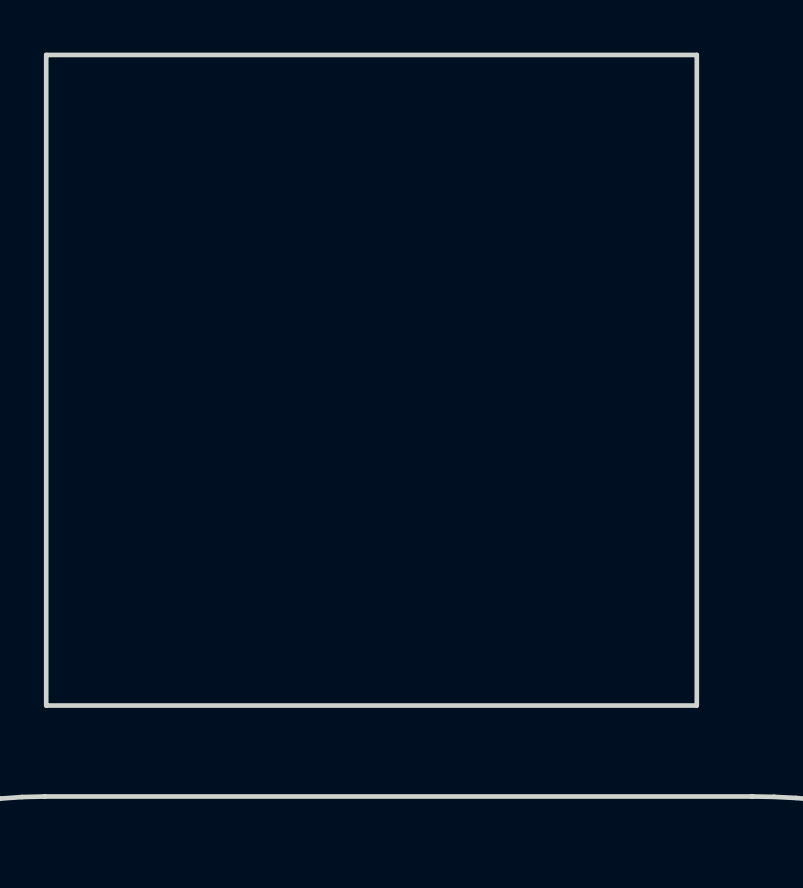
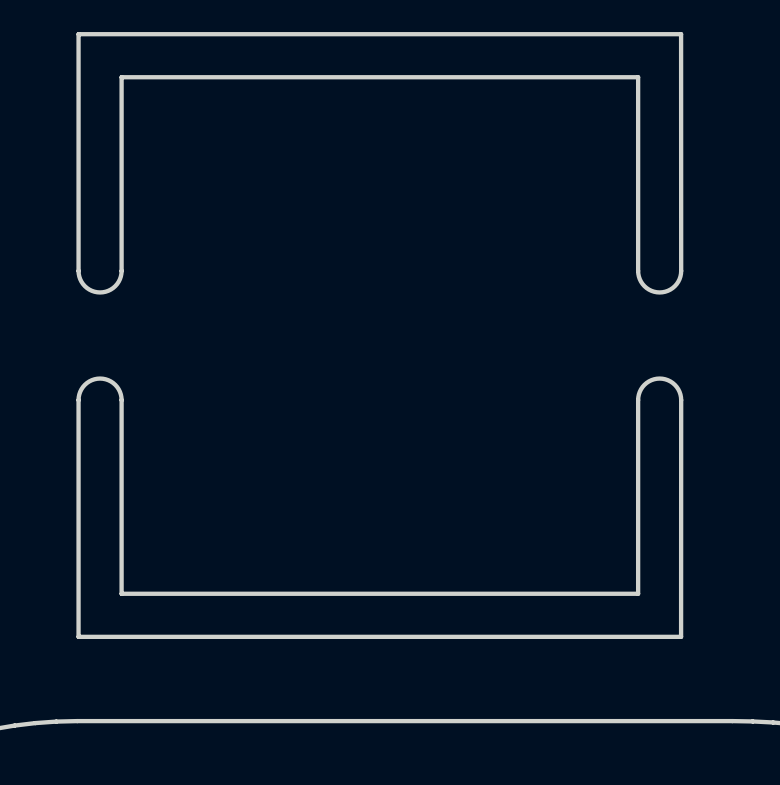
board edge: (696, 54) (696, 705) -> (78, 400) (83, 386) (89, 381) (97, 378) (105, 379) (113, 382) (120, 394) (121, 593) (638, 593) (638, 397) (641, 389) (648, 381) (656, 378) (667, 380) (678, 389) (681, 400) (681, 636)
board edge: (46, 310) (46, 449) -> (78, 270) (80, 279) (84, 286) (97, 292) (105, 291) (113, 288) (120, 276) (121, 77) (638, 77) (638, 273) (642, 284) (648, 289) (656, 292) (667, 290) (676, 284) (681, 270) (681, 34)

